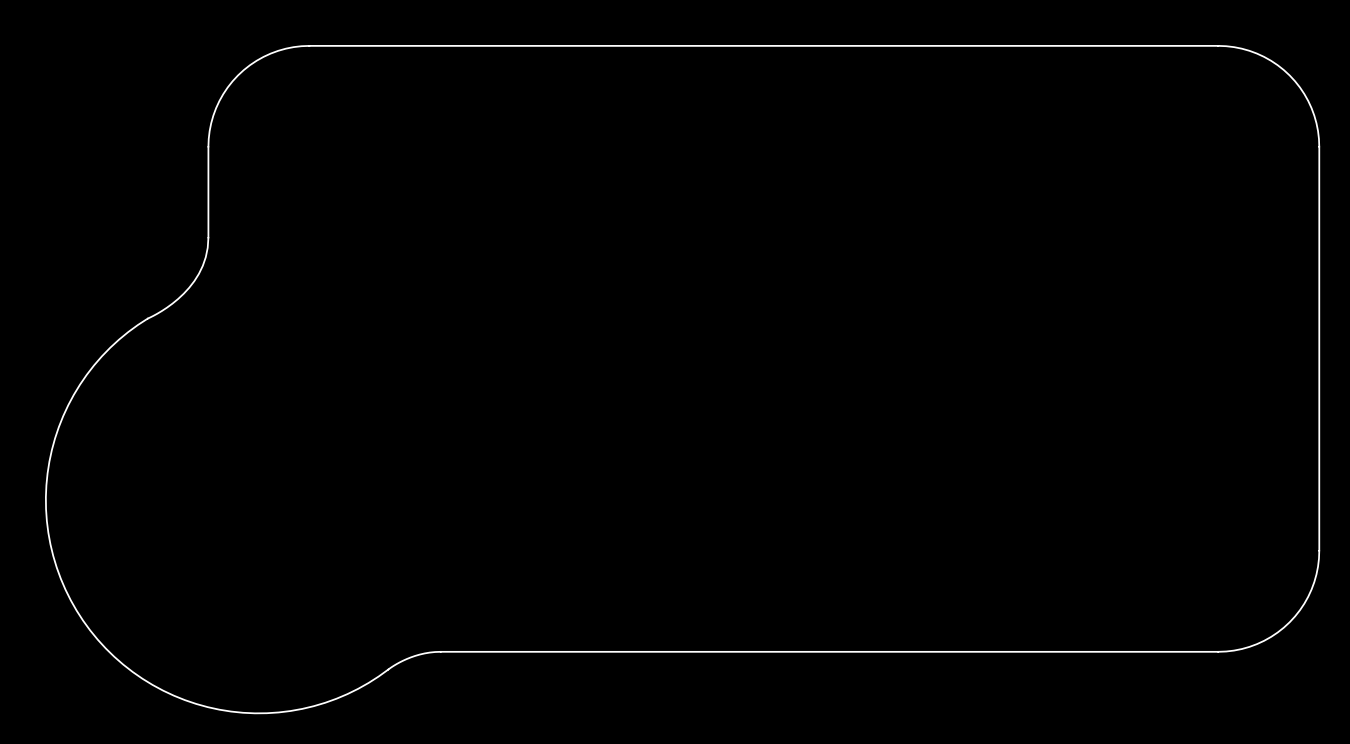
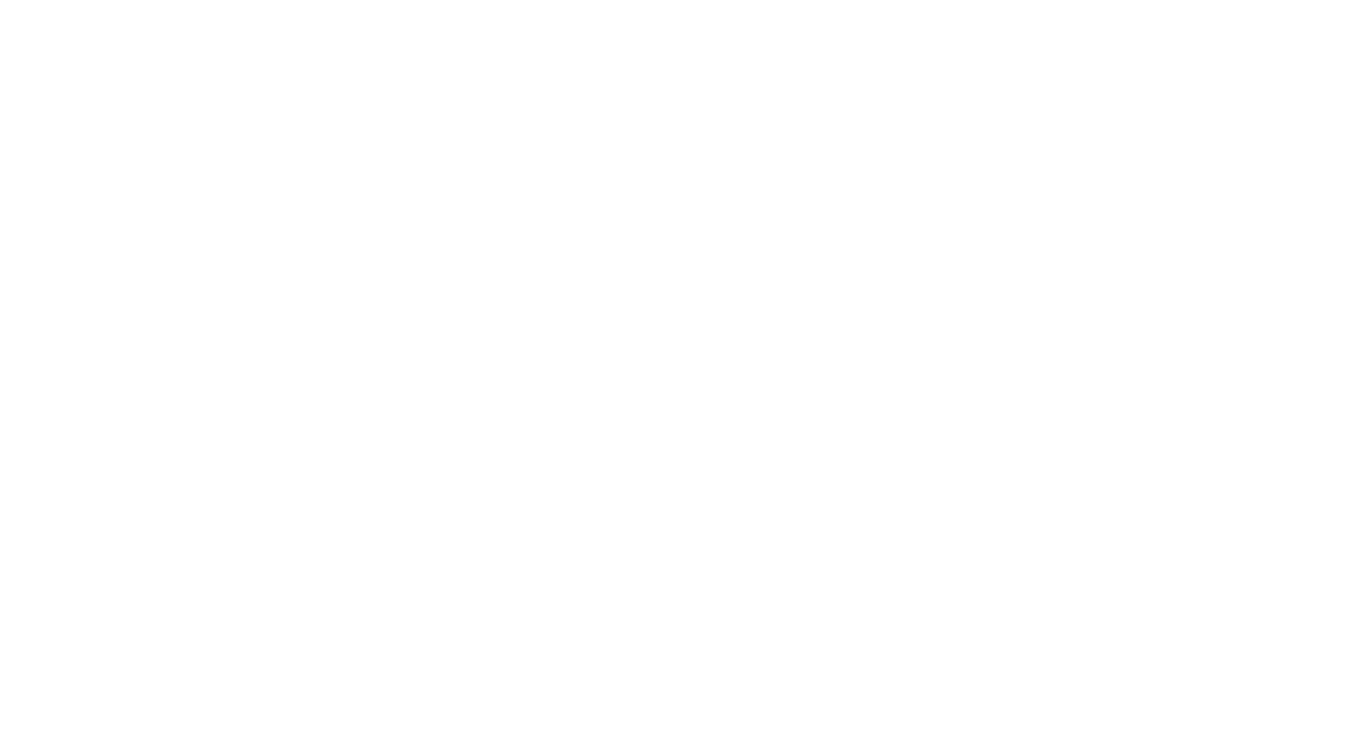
board edge: (1218, 45) (309, 45) (285, 48) (263, 56) (250, 65) (232, 81) (219, 101) (213, 115) (208, 138) (207, 247) (198, 273) (178, 299) (128, 332) (101, 356) (80, 384) (58, 427) (47, 473) (46, 509) (53, 556) (65, 589) (83, 620) (97, 639) (114, 656) (142, 678) (173, 695) (196, 703) (231, 711) (254, 713) (290, 711) (325, 702) (358, 688) (403, 660) (419, 654) (435, 652) (1218, 651) (1241, 649) (1264, 640) (1289, 622) (1304, 603) (1314, 582) (1318, 558) (1318, 138) (1311, 108) (1304, 94) (1289, 75) (1271, 60) (1256, 53) (1241, 48) (1218, 45) -> none

